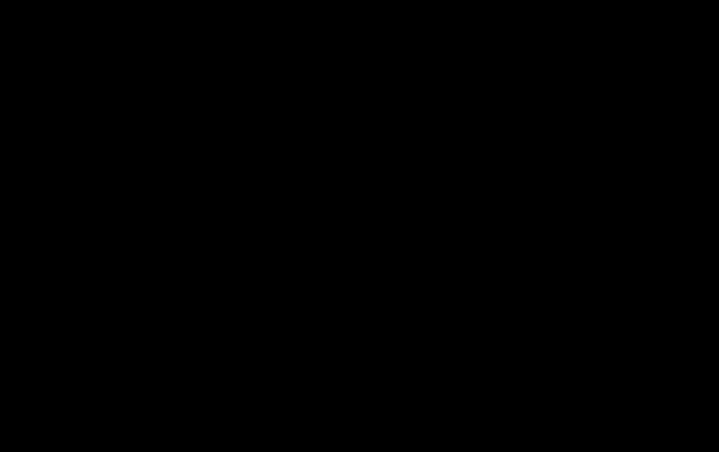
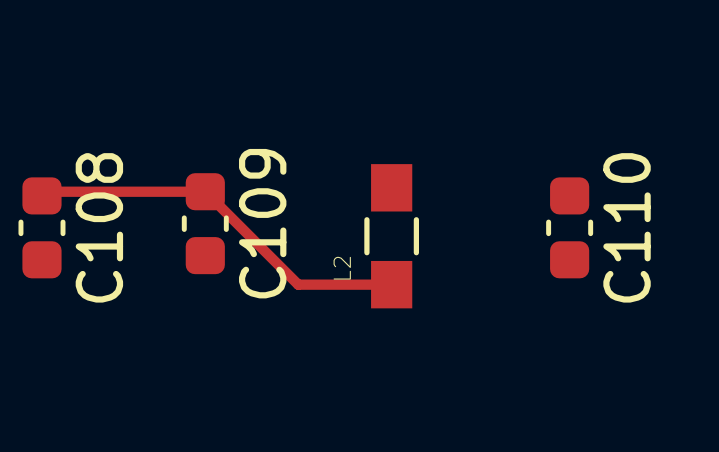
top track: none -> (41, 195) (46, 191) (205, 191) (298, 284) (391, 284)
C109: none -> (205, 223)
C108: none -> (41, 227)
C110: none -> (569, 227)
L2: none -> (391, 236)

